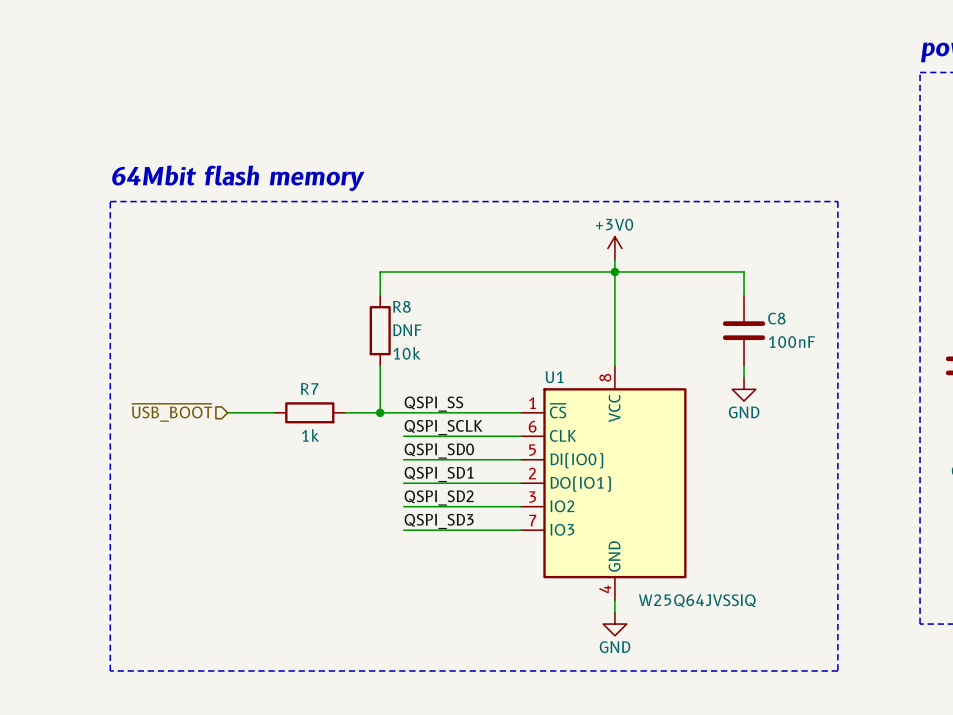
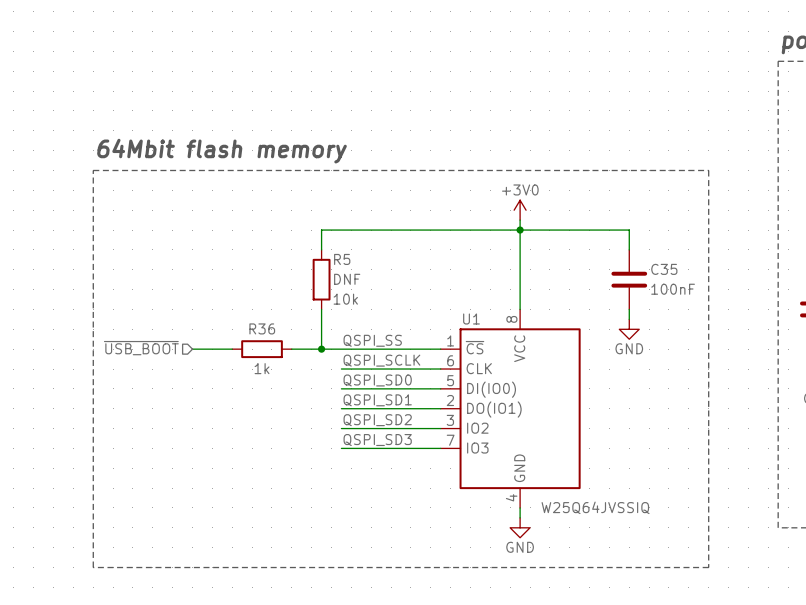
R8 name: R8 (401, 306) -> R5 (342, 259)
C8 name: C8 (776, 318) -> C35 (664, 269)
R7 name: R7 (309, 388) -> R36 (262, 328)

